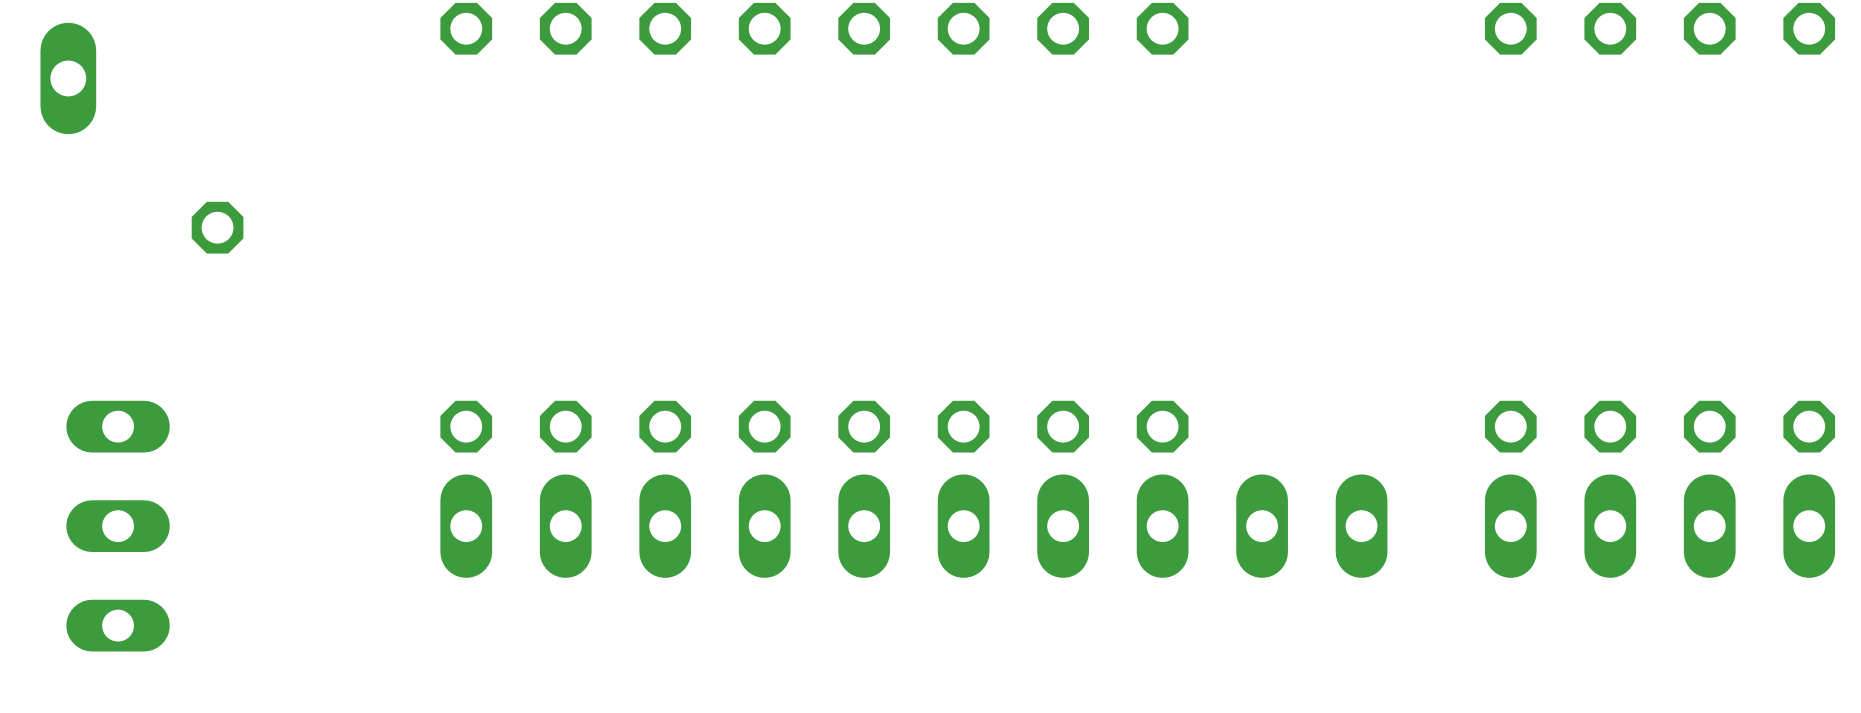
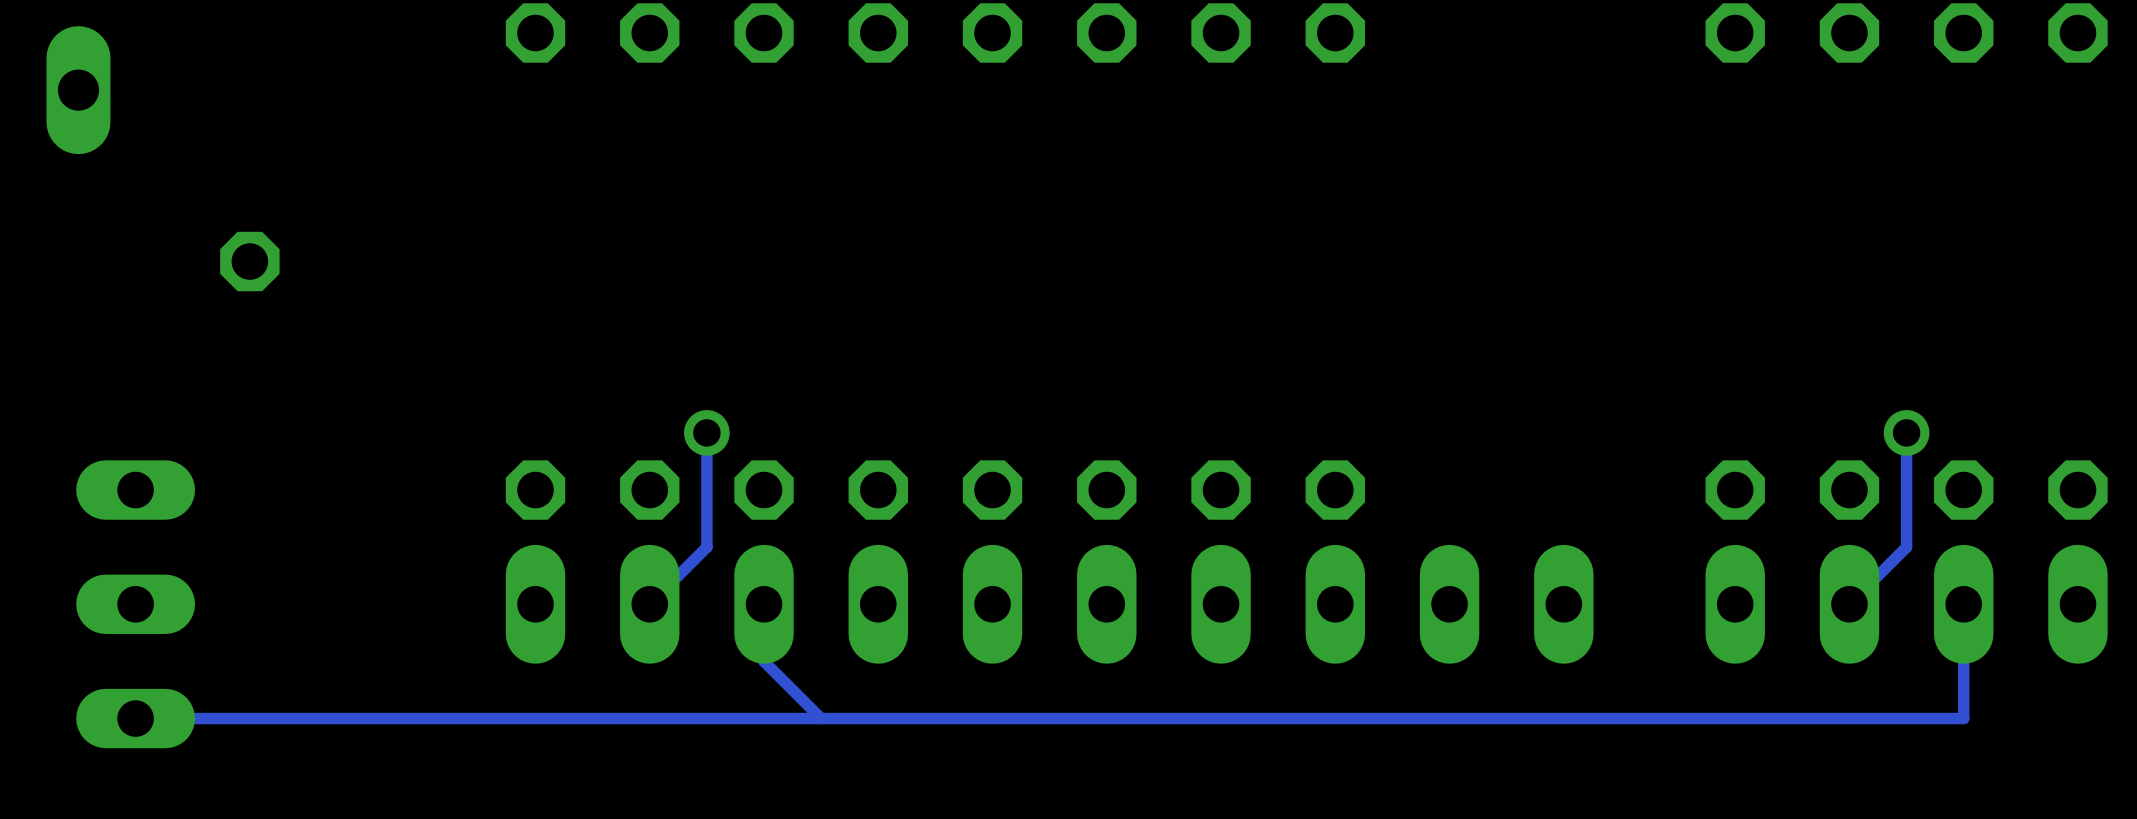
track: none -> (706, 432) (706, 547) (649, 604)
via: none -> (706, 432)
track: none -> (1906, 432) (1906, 547) (1849, 604)
via: none -> (1906, 432)
track: none -> (764, 604) (764, 661) (821, 718)
track: none -> (1963, 604) (1963, 718) (135, 718)

